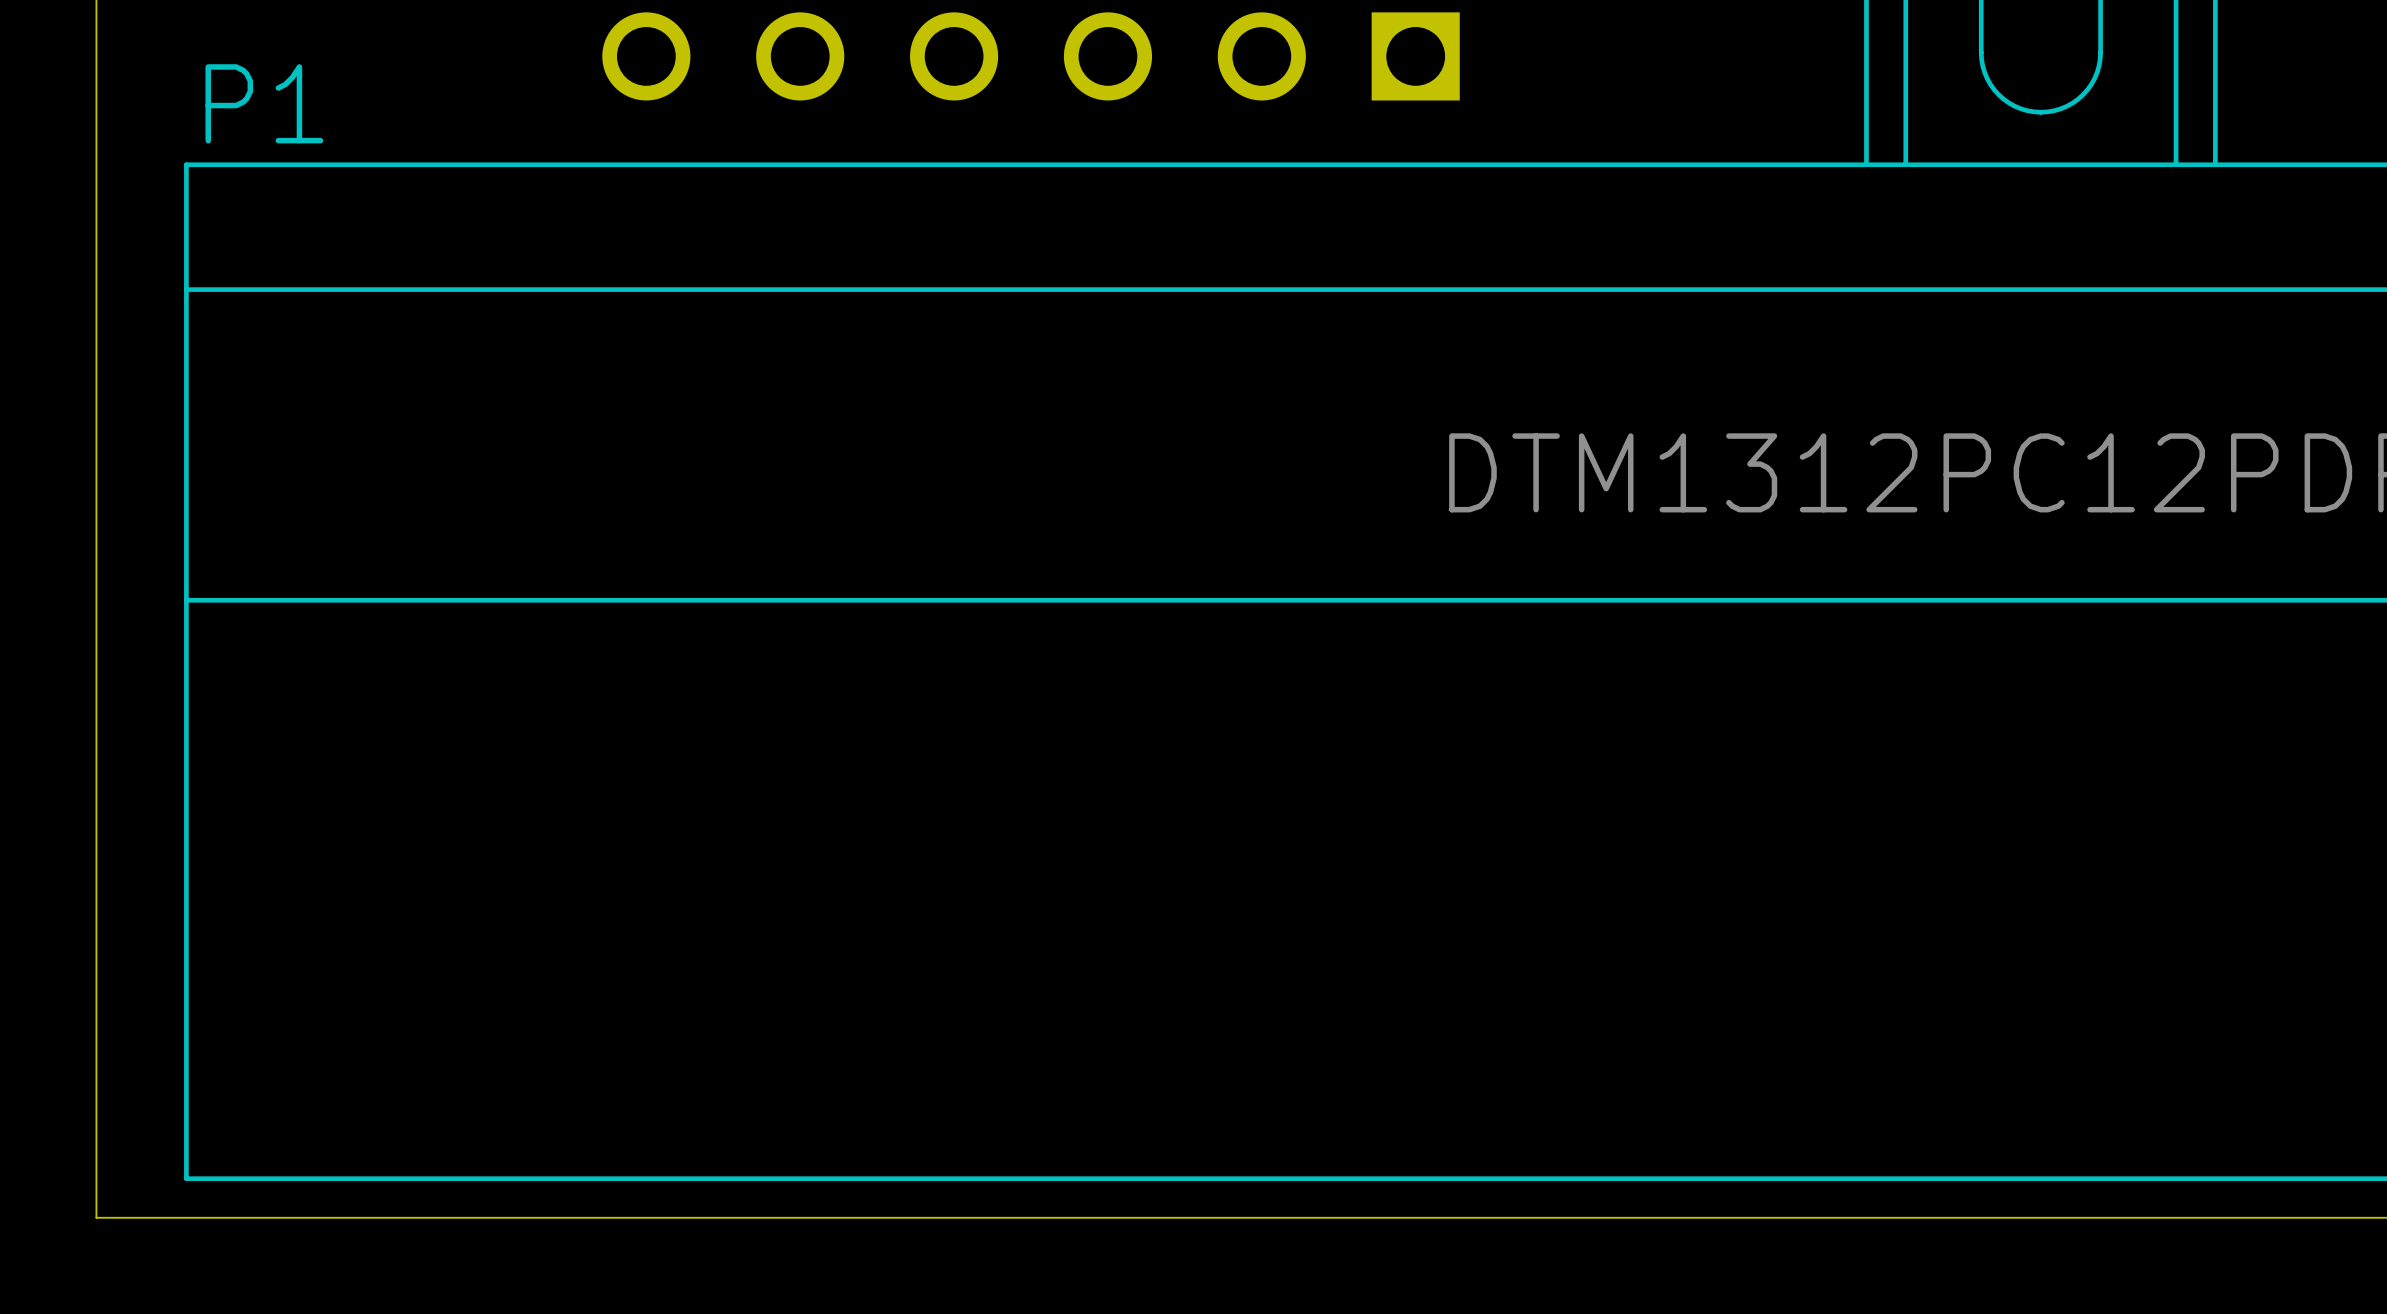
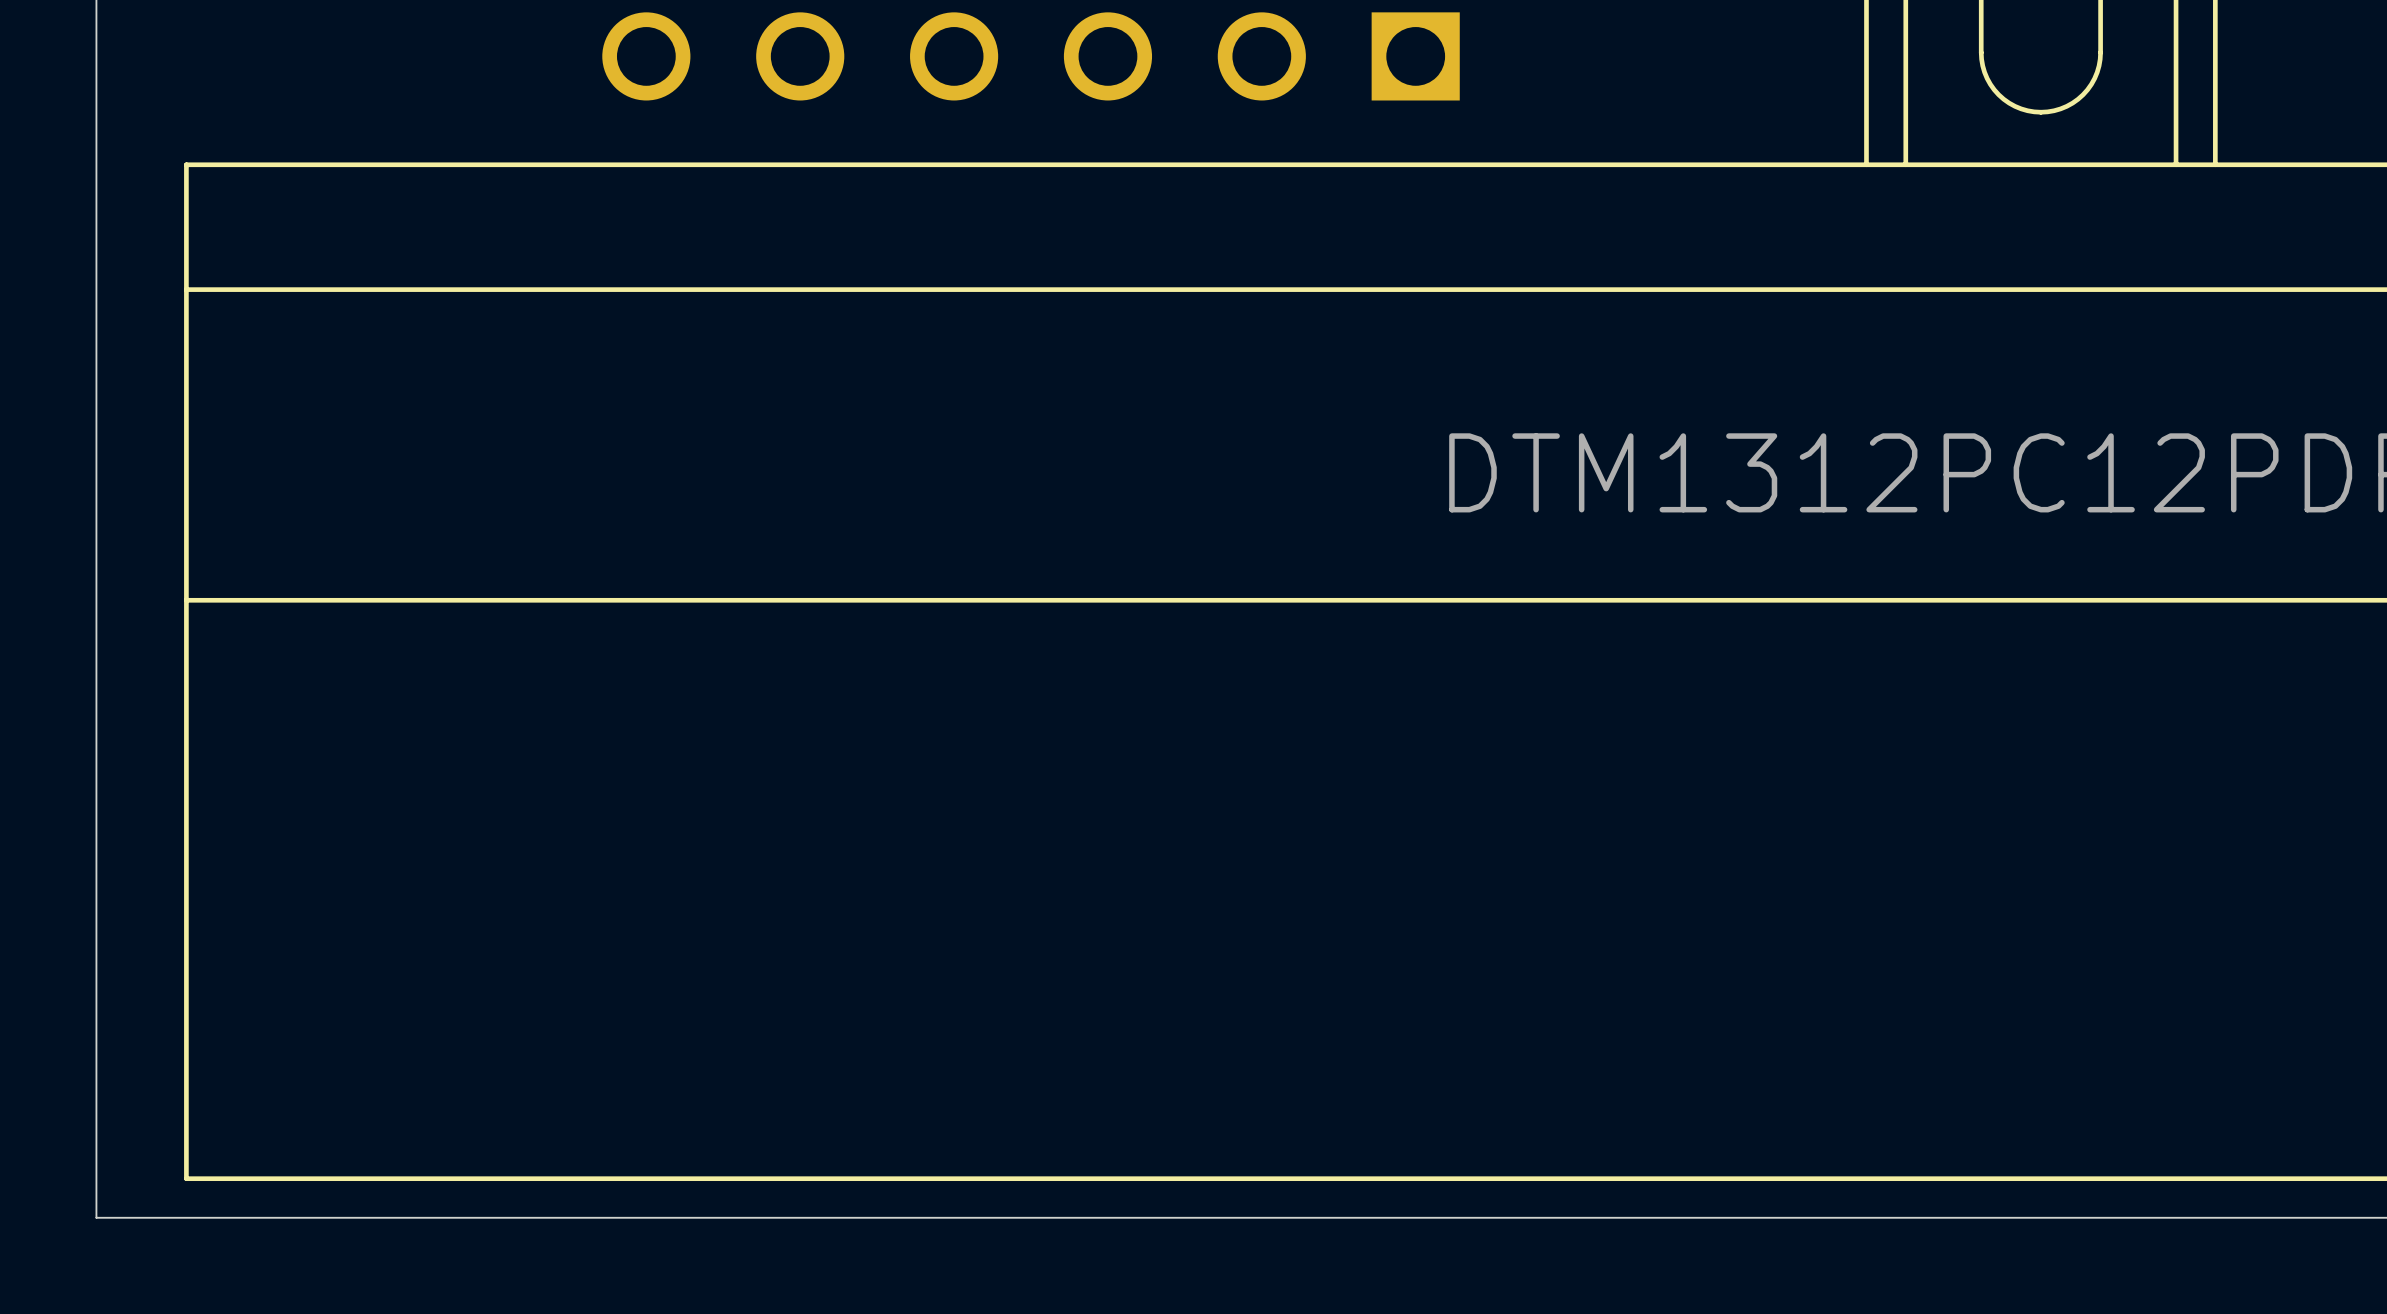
P1 name: P1 (264, 103) -> none

